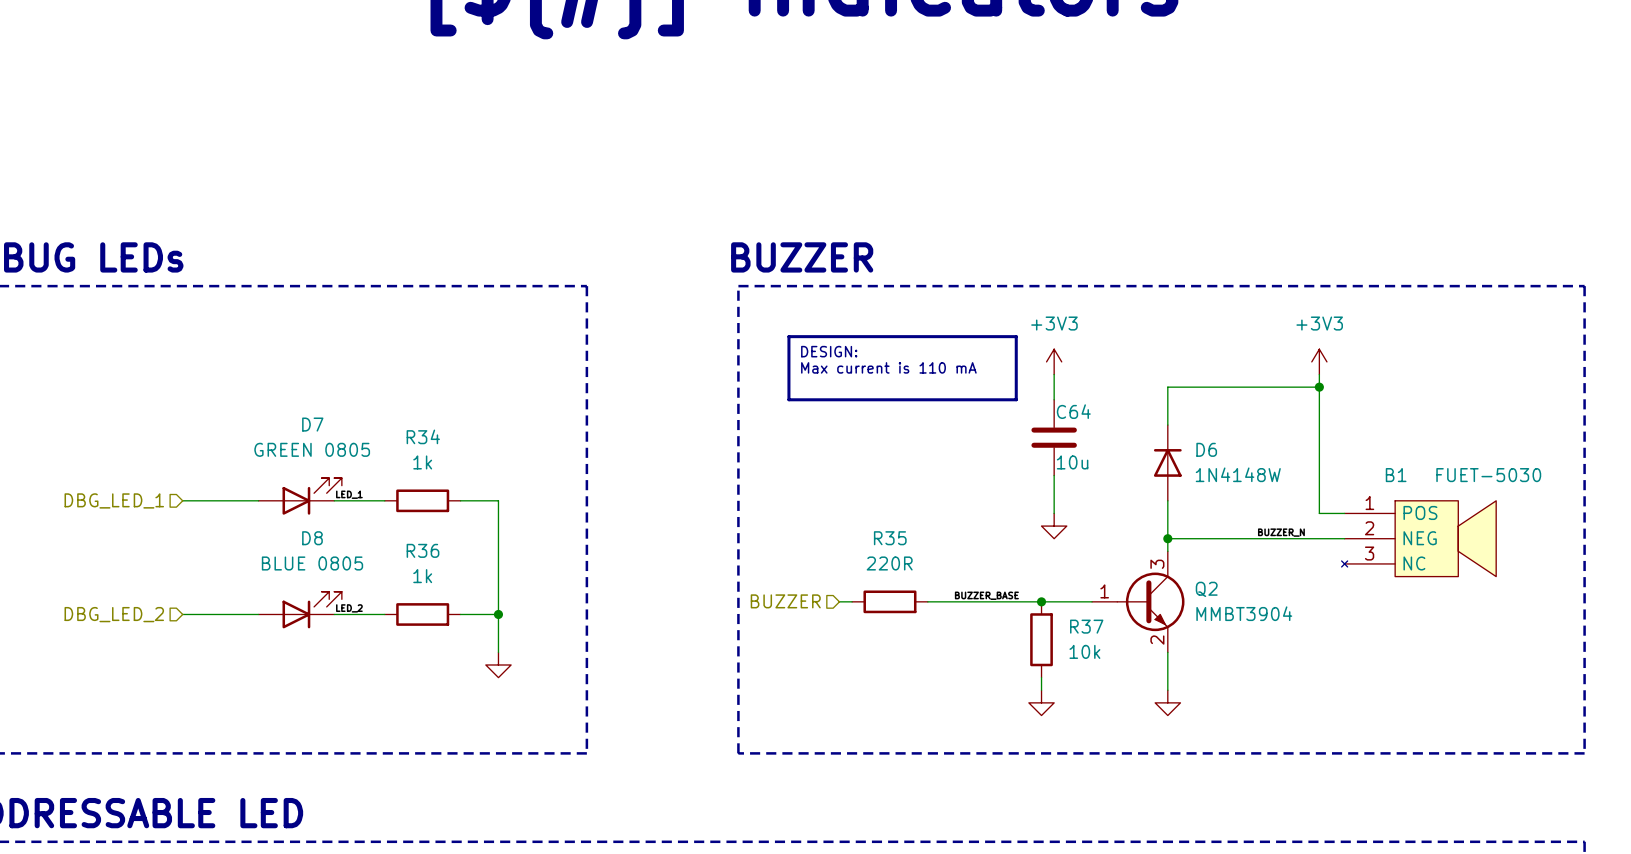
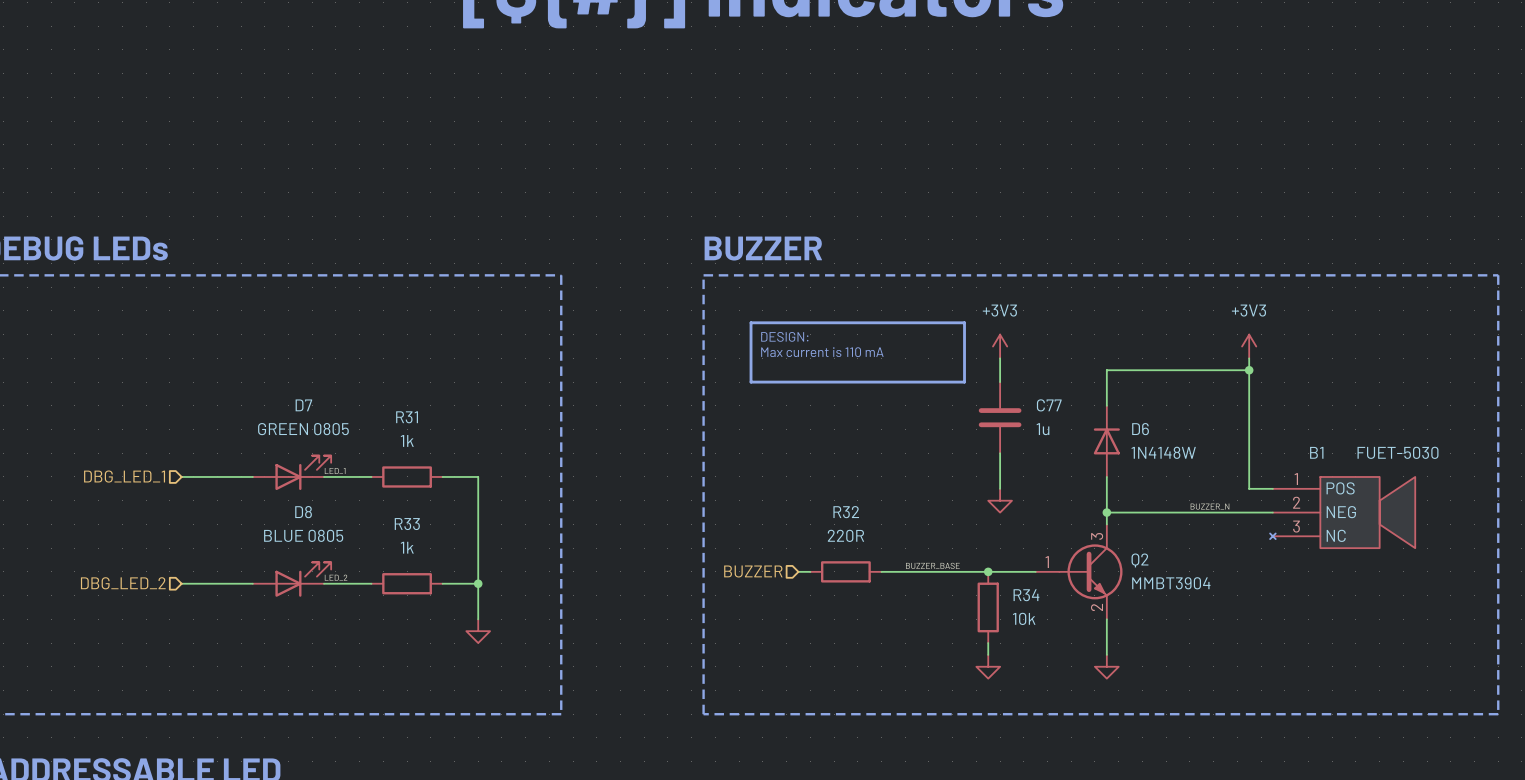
C64 name: C64 (1073, 411) -> C77 (1049, 405)
R34 name: R34 (423, 436) -> R31 (407, 417)
C64 value: 10u (1072, 462) -> 1u (1043, 429)
R35 name: R35 (890, 538) -> R32 (846, 512)
R36 name: R36 (422, 550) -> R33 (407, 524)
R37 name: R37 (1086, 626) -> R34 (1026, 595)

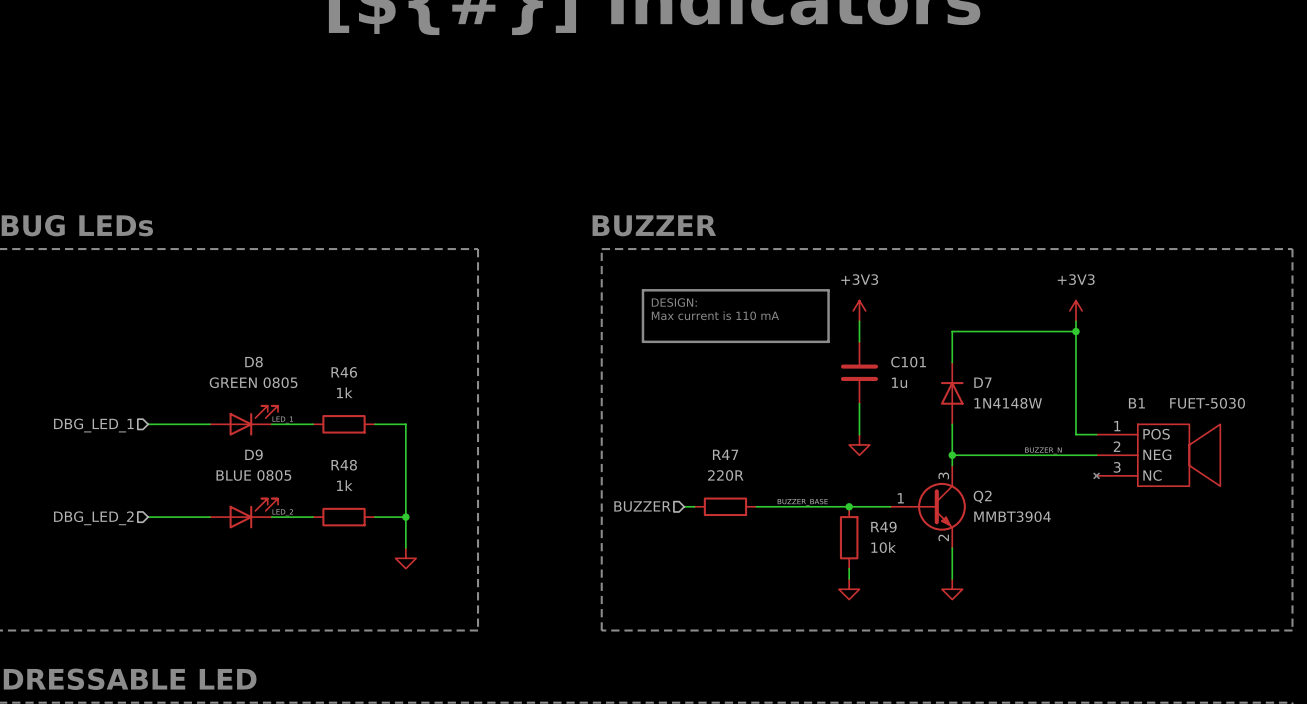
D7 name: D7 (303, 405) -> D8 (254, 362)
C77 name: C77 (1049, 405) -> C101 (908, 362)
R31 name: R31 (407, 417) -> R46 (344, 372)
D6 name: D6 (1140, 429) -> D7 (982, 382)
D8 name: D8 (303, 512) -> D9 (253, 454)
R32 name: R32 (846, 512) -> R47 (725, 454)
R33 name: R33 (407, 524) -> R48 (344, 465)
R34 name: R34 (1026, 595) -> R49 (883, 527)

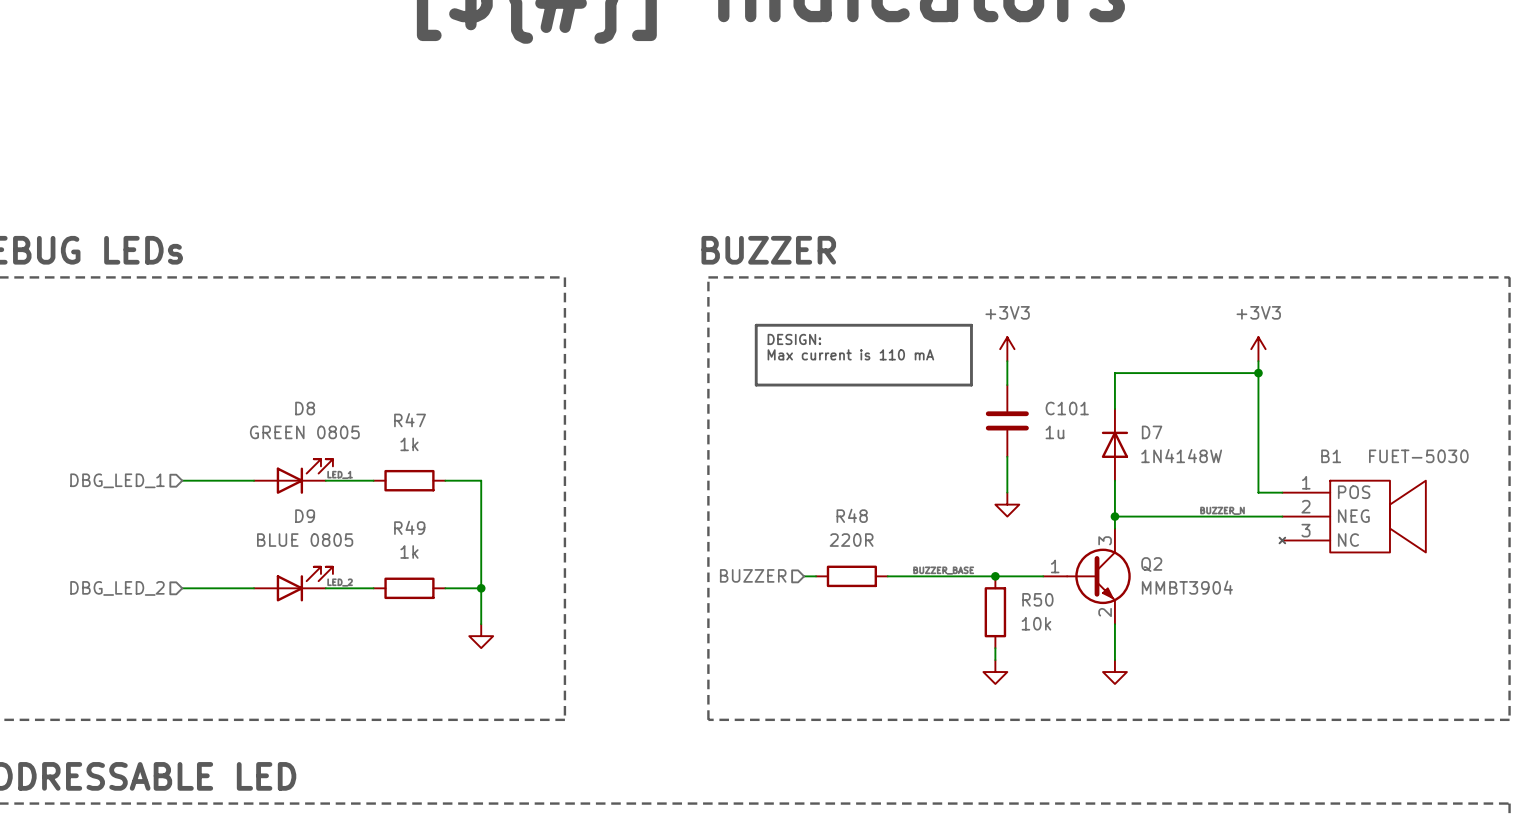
R46 name: R46 (344, 372) -> R47 (410, 420)
R47 name: R47 (725, 454) -> R48 (852, 515)
R48 name: R48 (344, 465) -> R49 (409, 527)
R49 name: R49 (883, 527) -> R50 (1037, 599)

